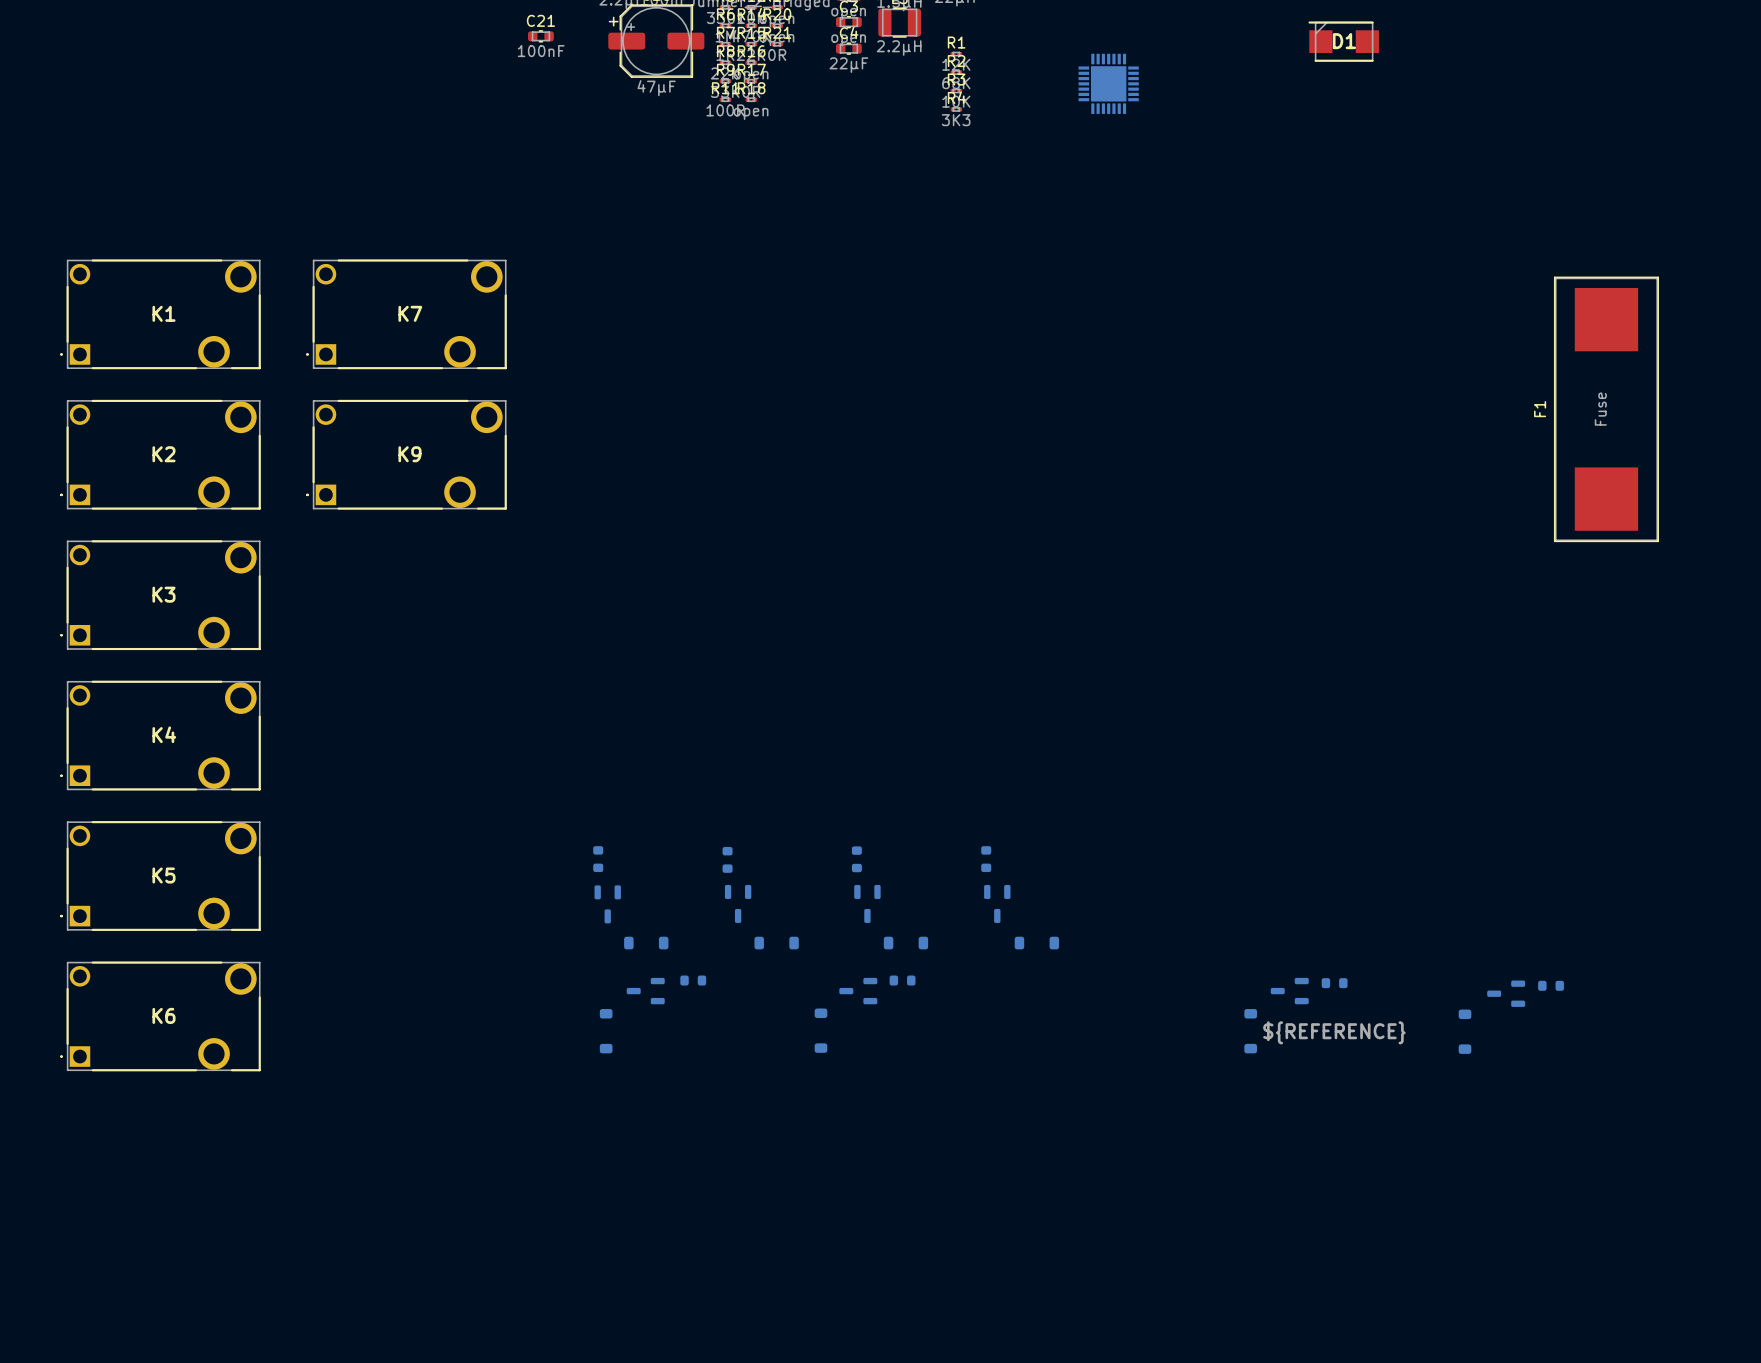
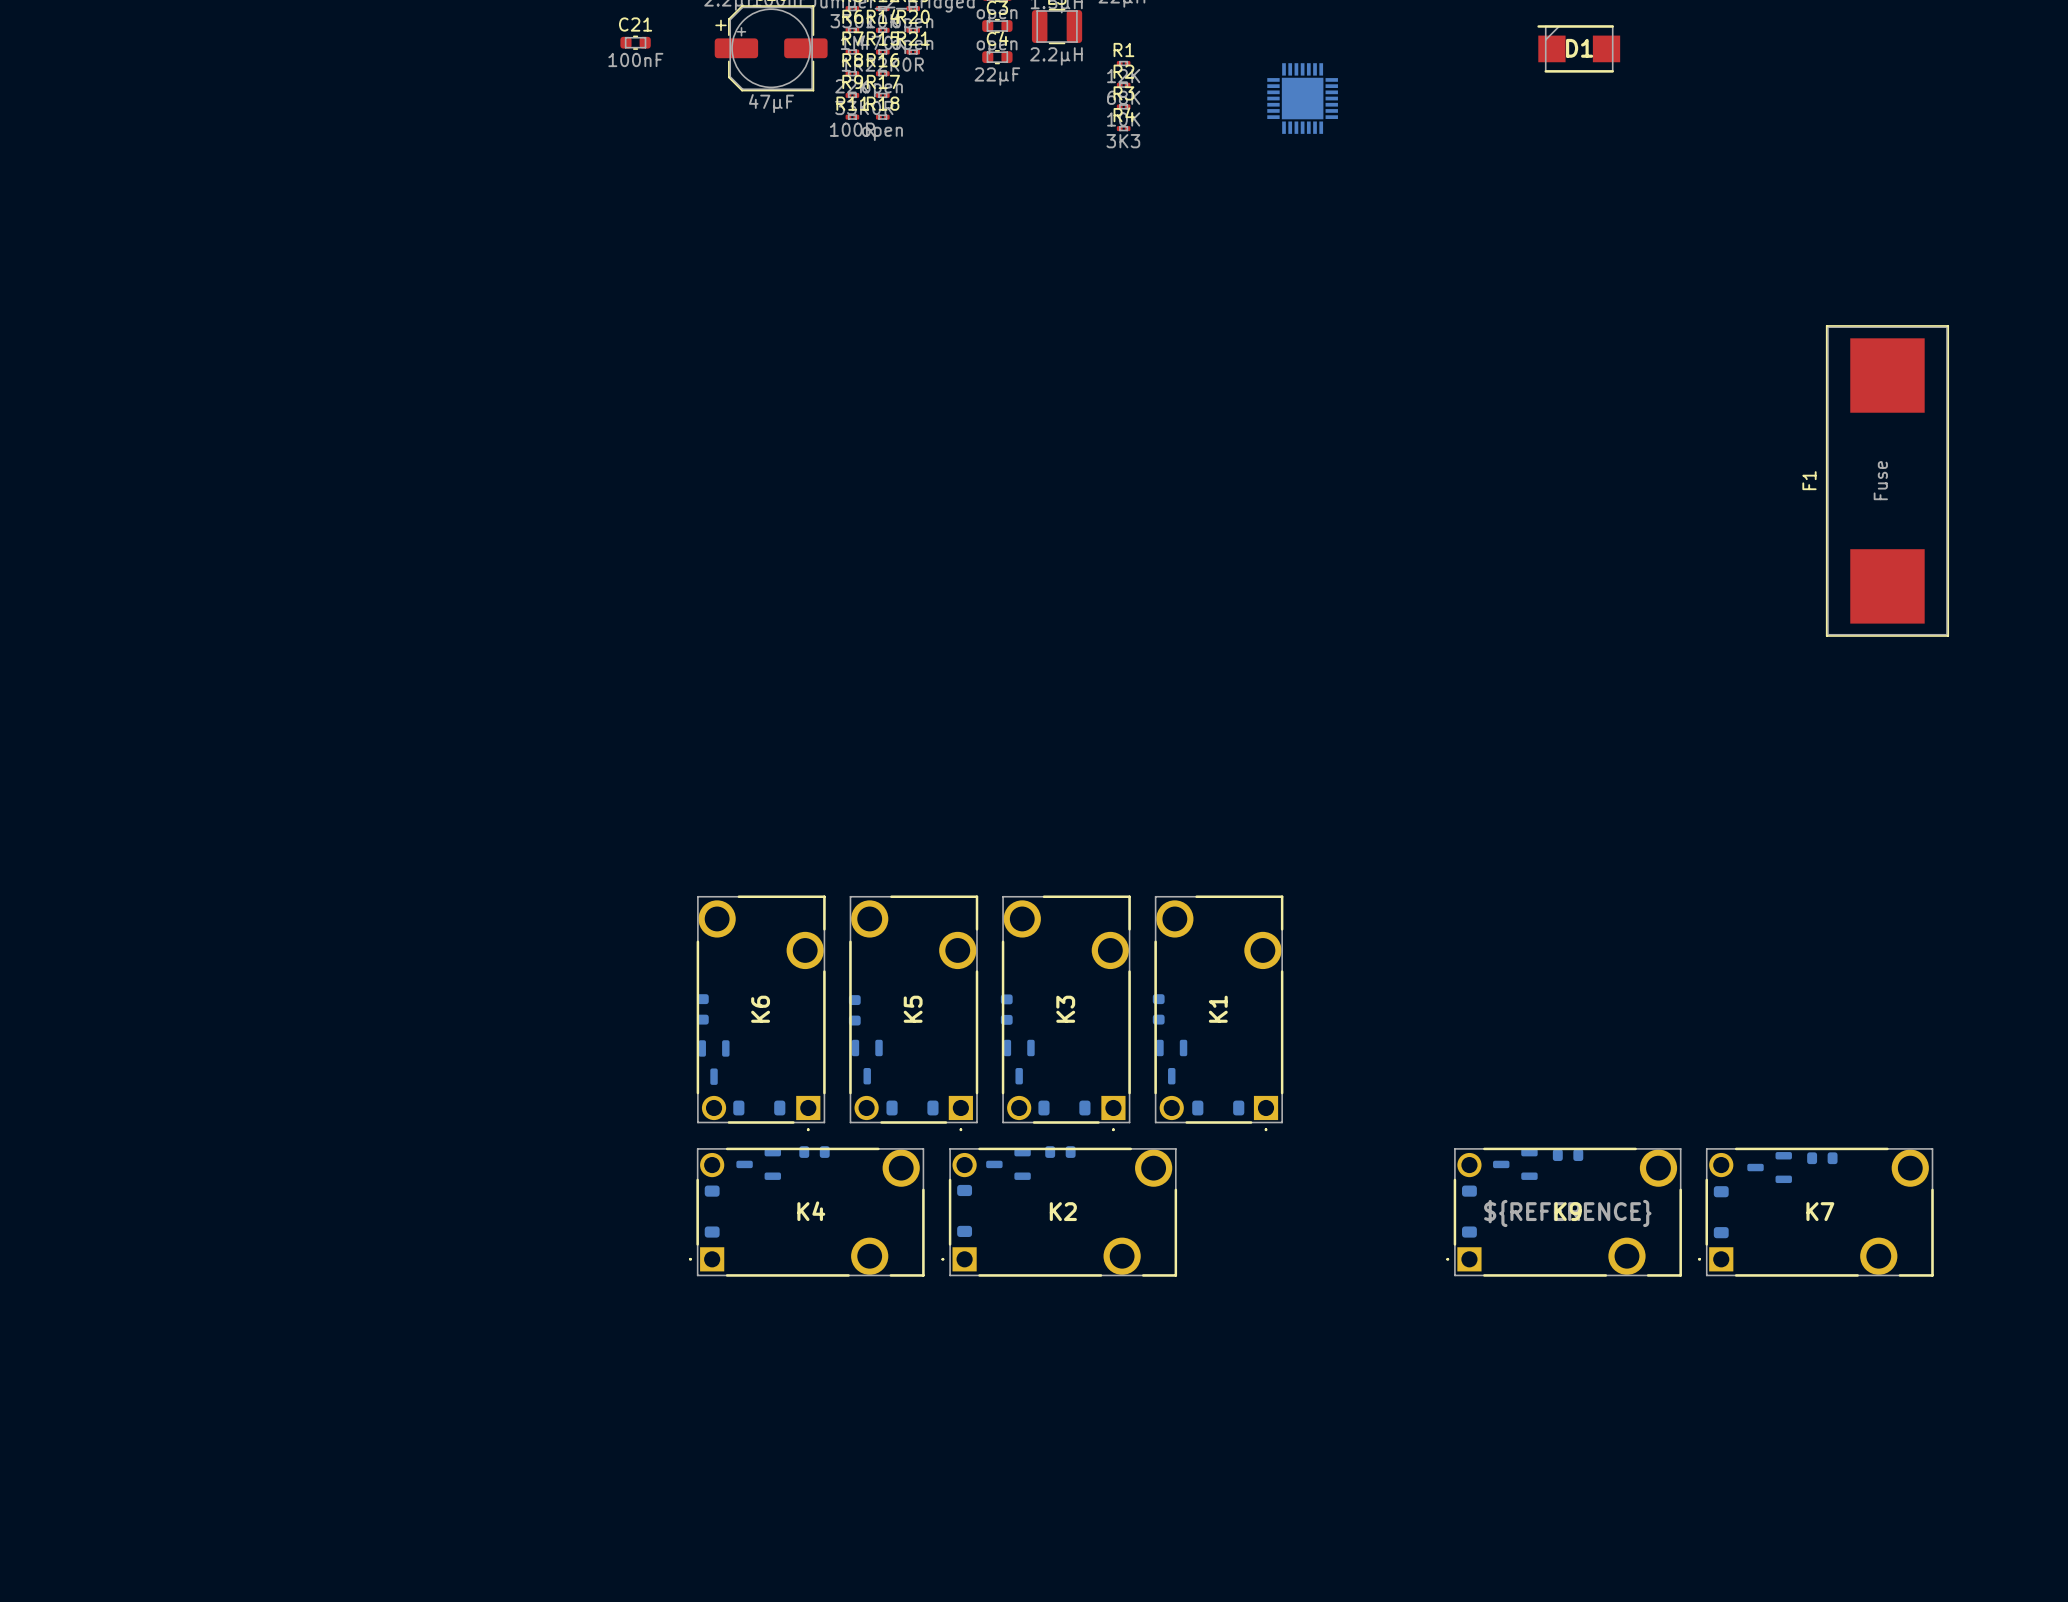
K1 rotation: 0° (160, 314) -> 90° counterclockwise (1218, 1013)
K1 position: (160, 314) -> (1218, 1013)
K7 position: (406, 314) -> (1816, 1212)
K2 position: (160, 454) -> (1059, 1212)
K9 position: (406, 454) -> (1564, 1212)
K3 rotation: 0° (160, 595) -> 90° counterclockwise (1066, 1013)
K3 position: (160, 595) -> (1066, 1013)
K4 position: (160, 735) -> (806, 1212)
K5 rotation: 0° (160, 876) -> 90° counterclockwise (913, 1013)
K5 position: (160, 876) -> (913, 1013)
K6 rotation: 0° (160, 1016) -> 90° counterclockwise (761, 1013)
K6 position: (160, 1016) -> (761, 1013)

